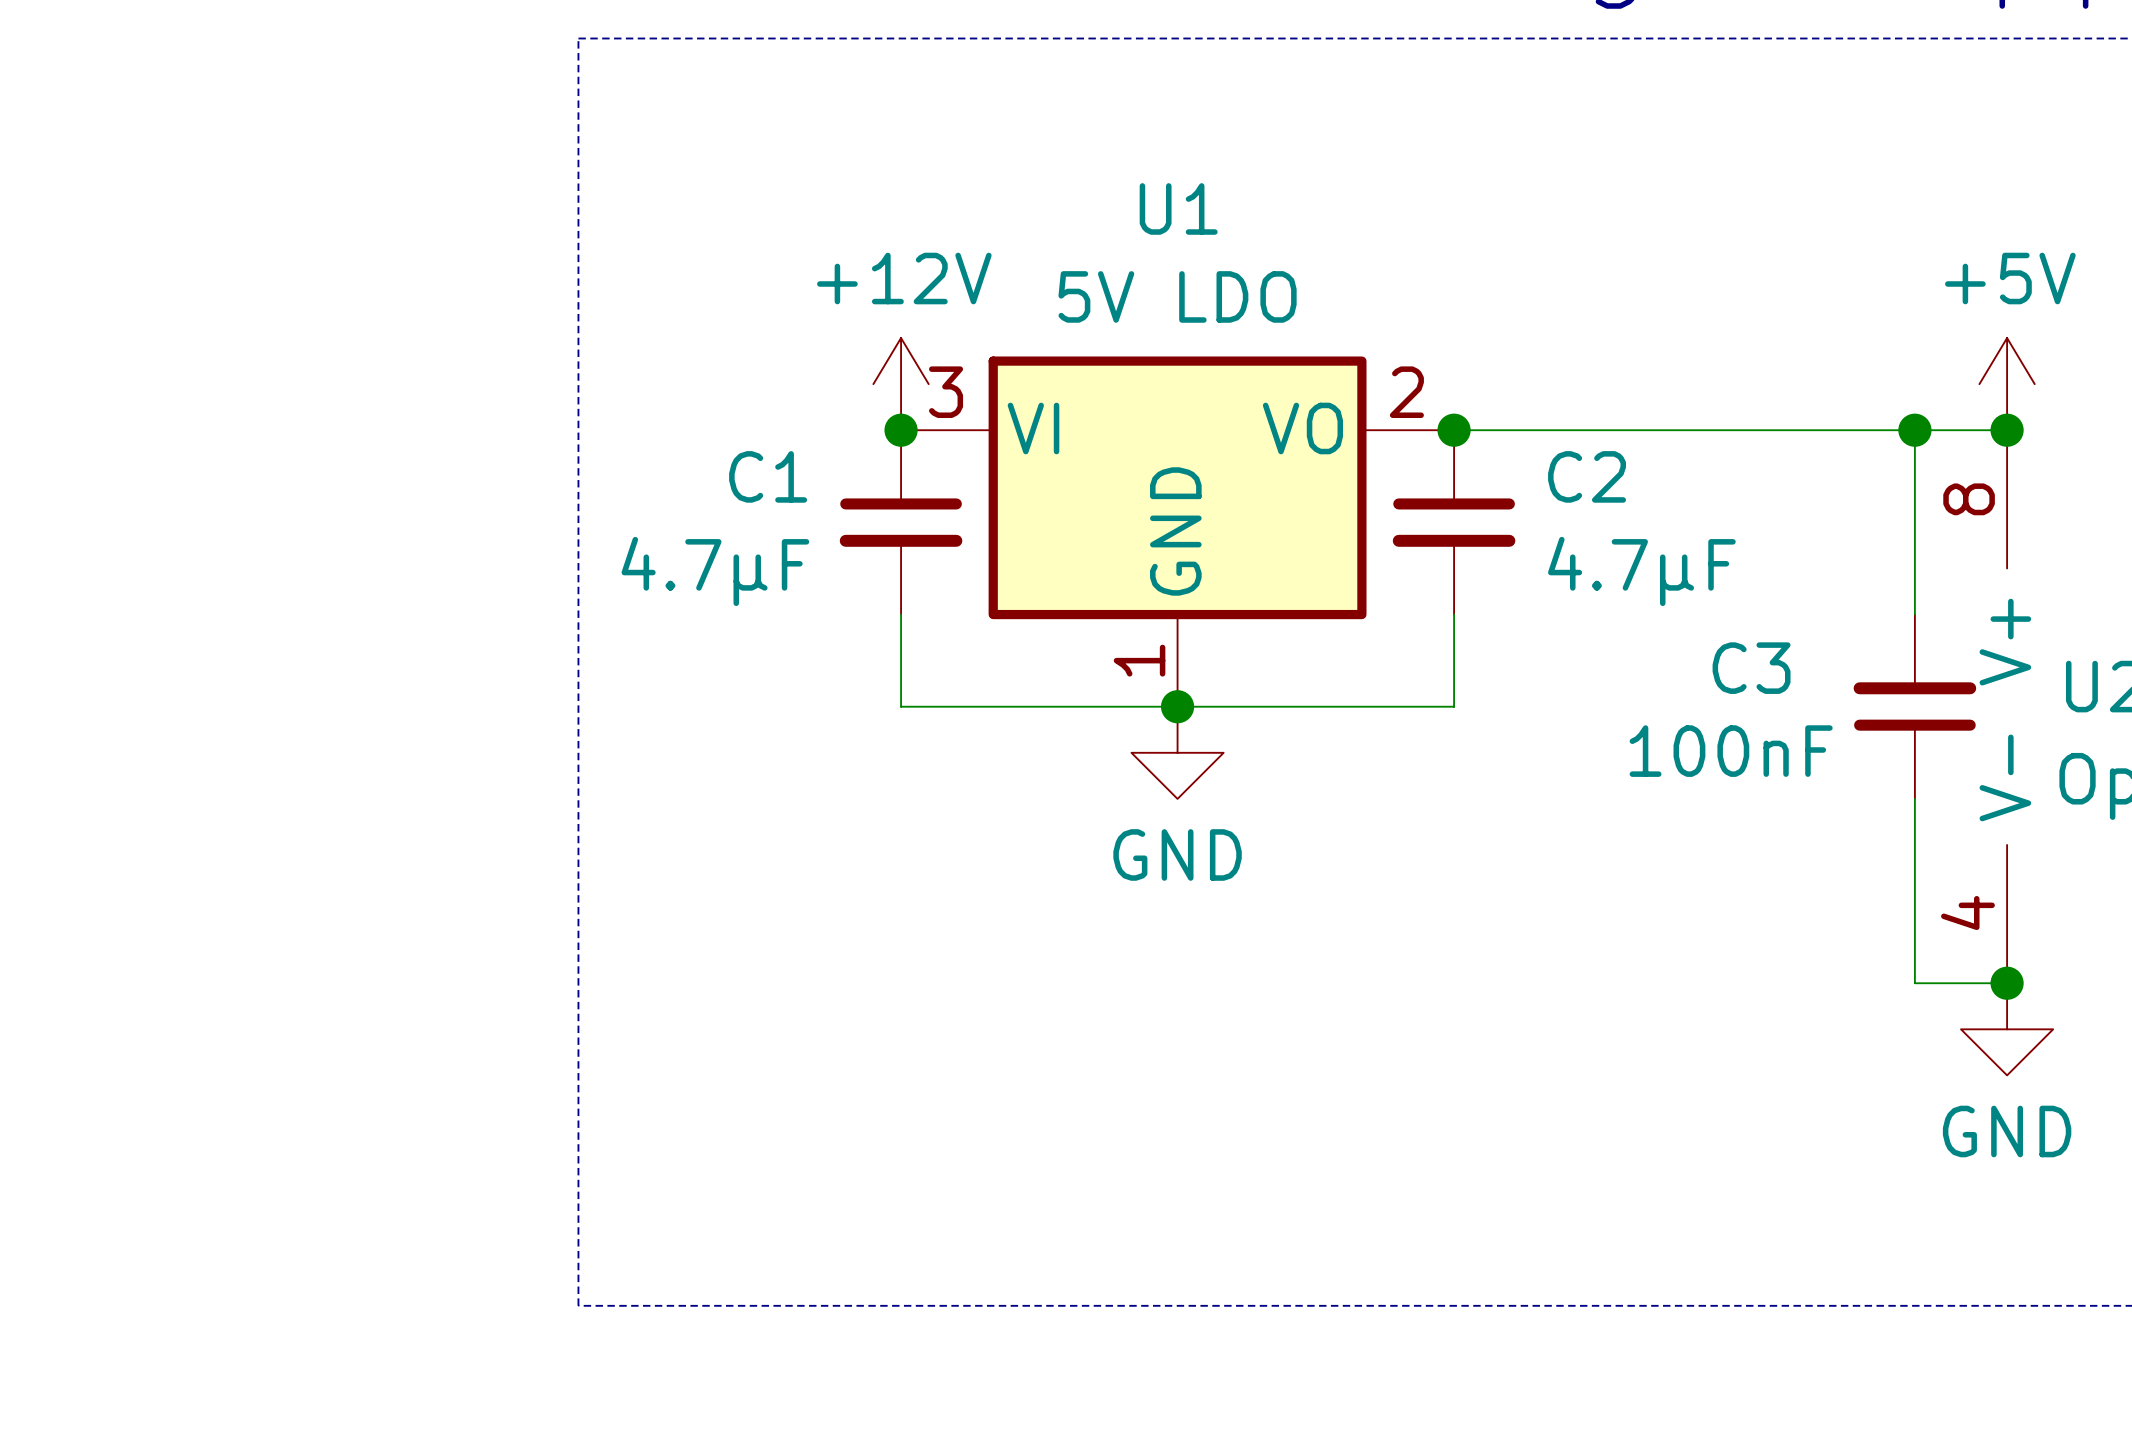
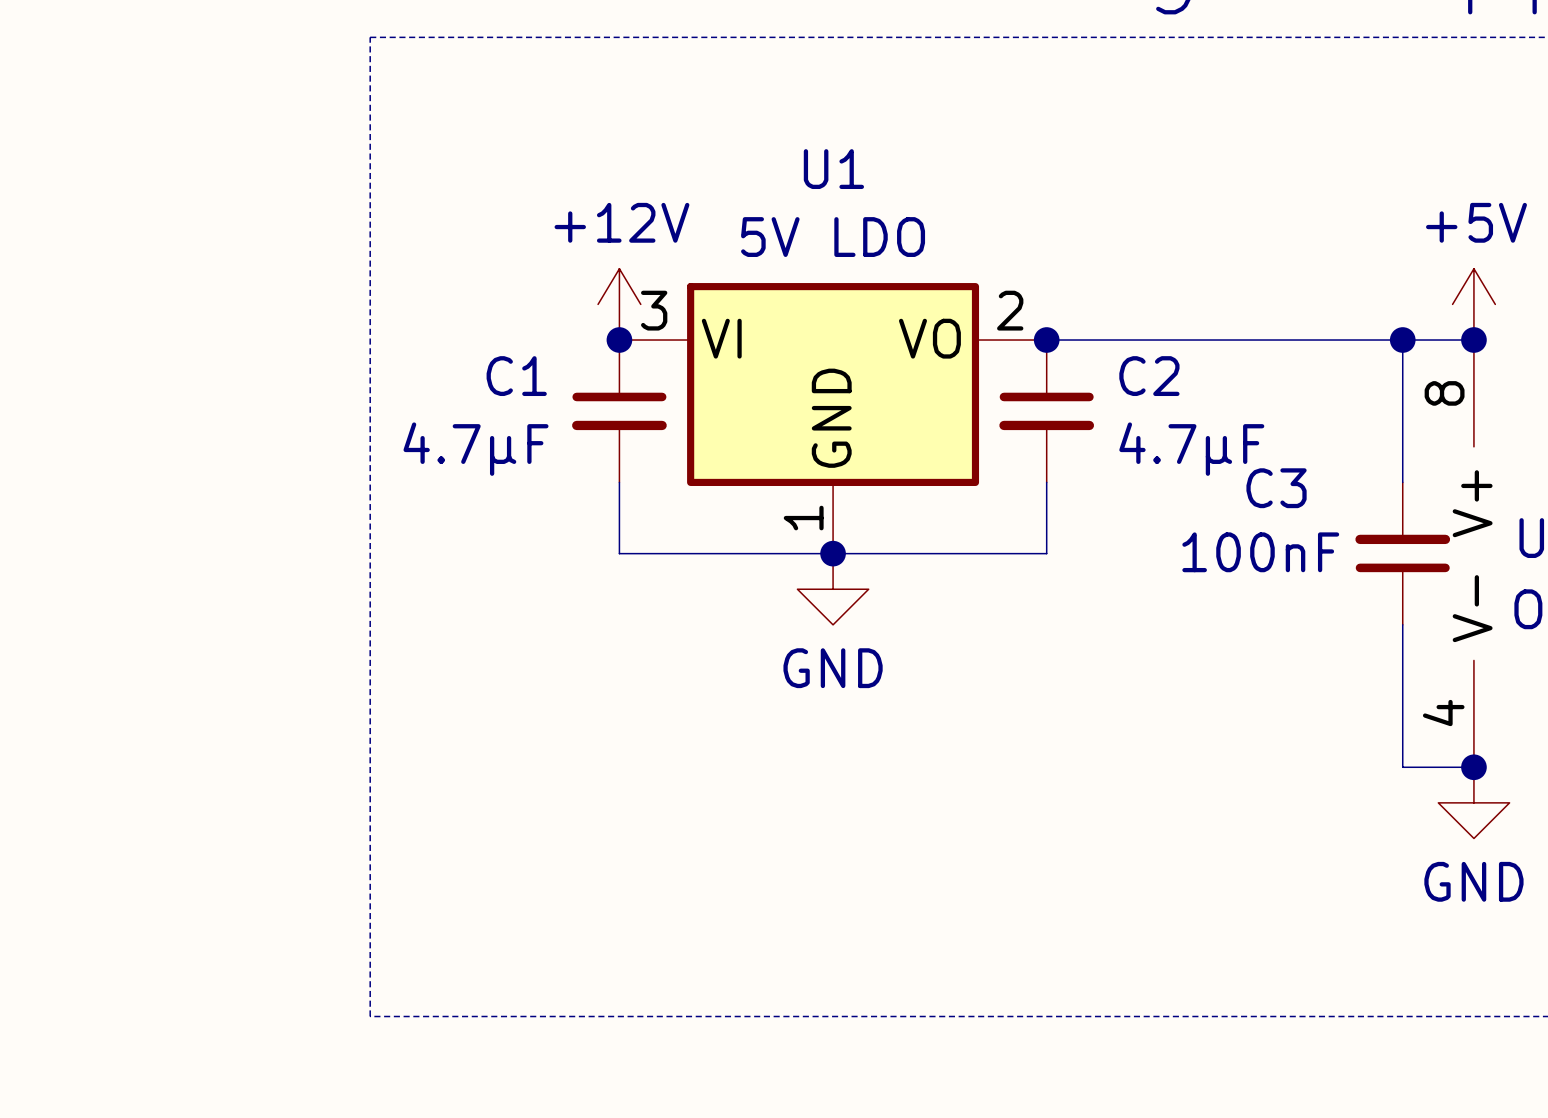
C3 name position: C3 (1751, 668) -> C3 (1276, 488)
C3 value position: 100nF (1731, 751) -> 100nF (1260, 552)

